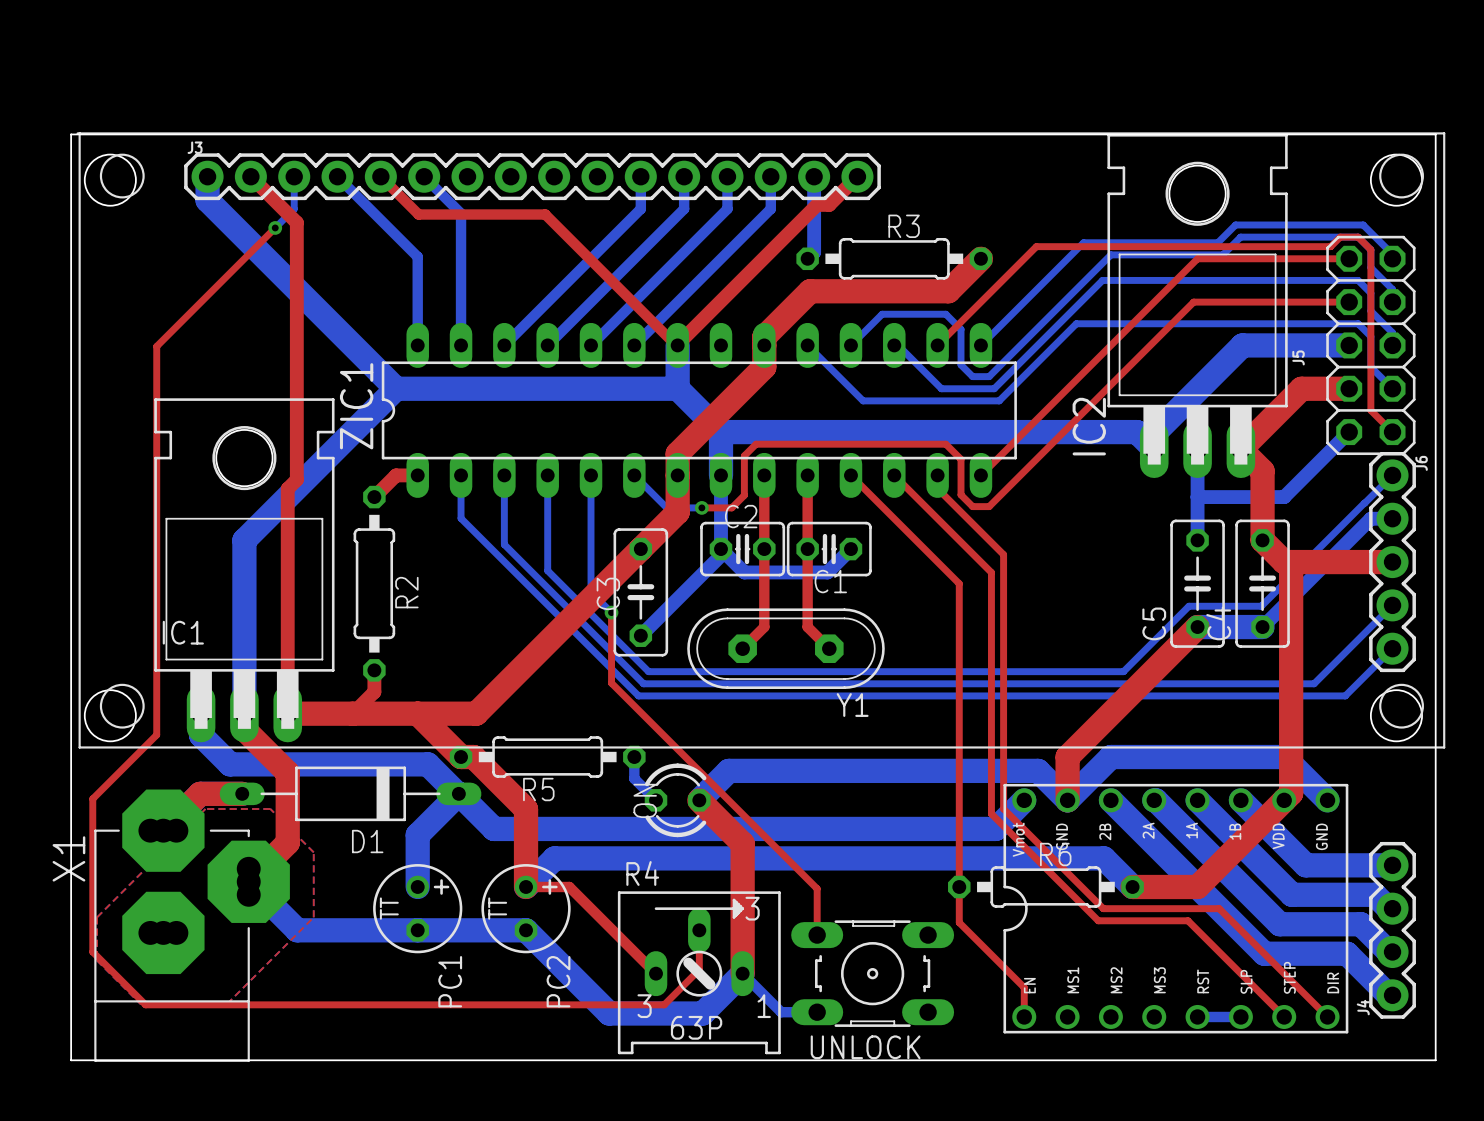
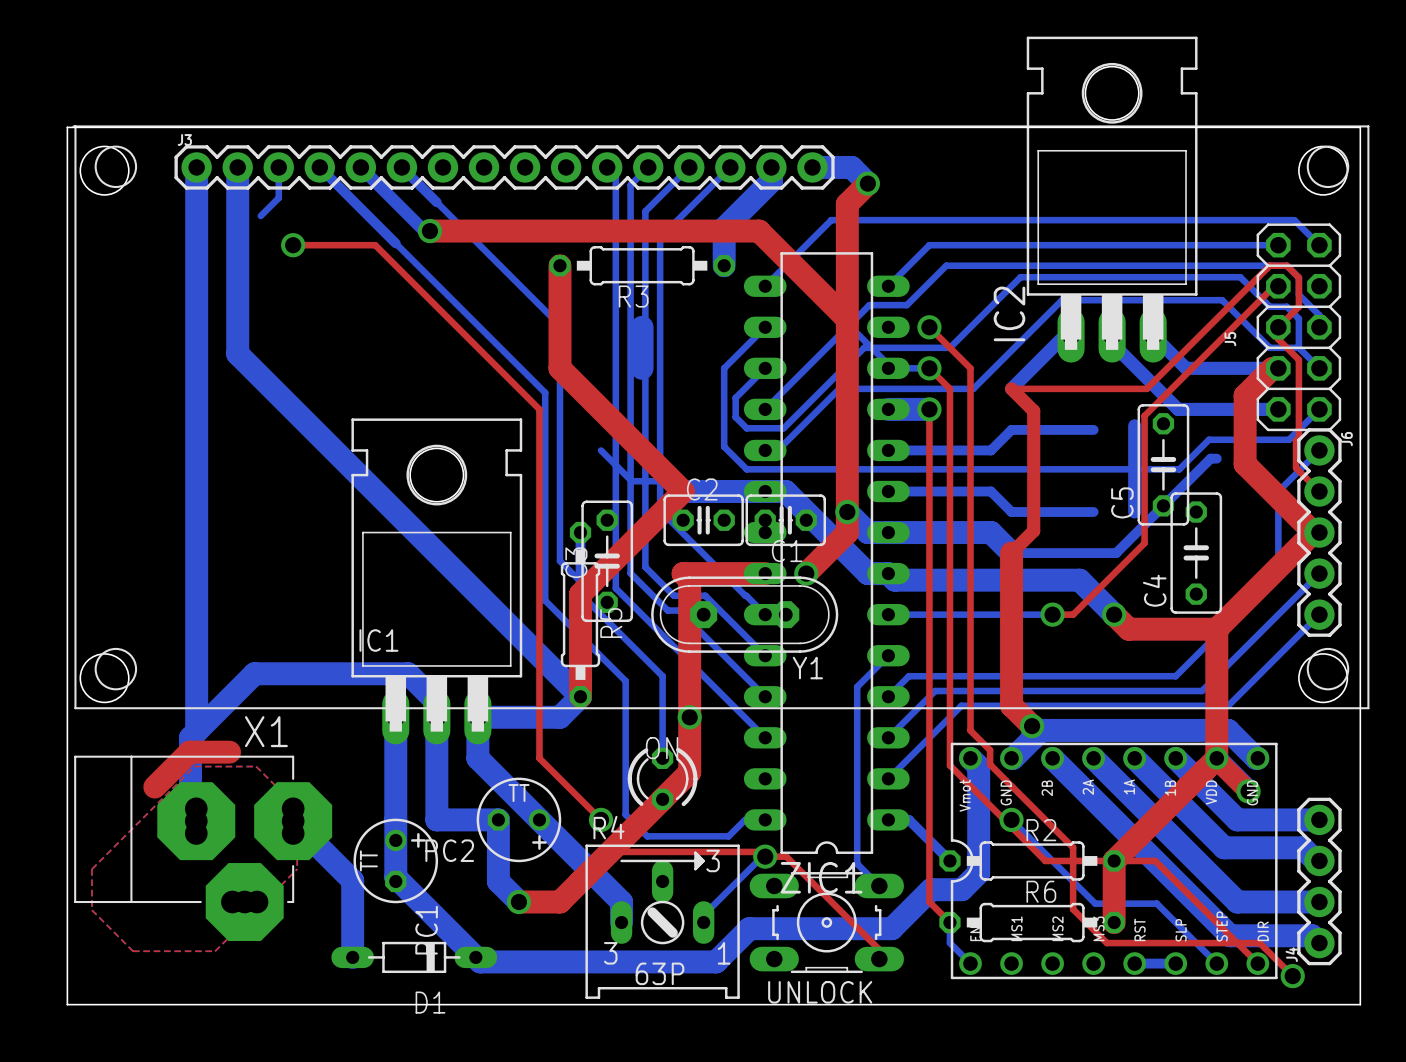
top track: (250, 176) (296, 222) (296, 479) (287, 488) (287, 713) (476, 713) (677, 512) (677, 453) (764, 367) (764, 337) (810, 291) (948, 291) (980, 258) -> none
bottom track: none -> (237, 167) (237, 353) (580, 696) (559, 717) (477, 717) (477, 758) (621, 902) (621, 922)
top track: (380, 176) (418, 214) (545, 214) (676, 345) (817, 204) (829, 204) (857, 176) -> none
bottom track: none -> (360, 167) (424, 231) (429, 231)
bottom track: (640, 176) (640, 208) (504, 345) -> (607, 167) (615, 176) (615, 588) (765, 737)
bottom track: (684, 176) (684, 208) (547, 345) -> (648, 167) (630, 185) (630, 573) (667, 610) (679, 610) (765, 696)
bottom track: (727, 176) (727, 208) (591, 345) -> (689, 167) (645, 211) (645, 567) (673, 595) (705, 595) (765, 655)
bottom track: (770, 176) (770, 208) (634, 345) -> (730, 167) (660, 237) (660, 510) (765, 614)
bottom track: none -> (812, 167) (851, 167) (867, 183)
bottom track: (814, 191) (814, 252) (807, 258) -> (771, 181) (724, 228) (724, 265)
top track: none -> (867, 183) (847, 204) (847, 532) (806, 573)
via: none -> (867, 183)
bottom track: (207, 200) (396, 388) -> (196, 189) (196, 731)
bottom track: (461, 213) (461, 345) -> (436, 202) (559, 325) (559, 450)
R3 name position: R3 (904, 226) -> R3 (633, 296)
top track: (275, 227) (156, 346) (156, 734) (92, 798) (92, 951) (145, 1004) (664, 1004) (699, 969) (699, 930) -> none
via: (275, 227) -> none
top track: none -> (429, 231) (759, 231) (847, 319)
via: none -> (429, 231)
bottom track: (417, 256) (417, 345) -> (395, 243) (545, 392) (545, 600) (625, 681) (625, 814) (647, 836) (728, 836) (745, 819) (765, 819)
top track: none -> (293, 245) (375, 245) (539, 409) (539, 758) (601, 819)
via: none -> (293, 245)
R3 position: (894, 258) -> (642, 265)
top track: (1349, 258) (1197, 258) (980, 475) -> none
bottom track: none -> (1278, 245) (929, 245) (888, 286)
bottom track: (1392, 258) (1392, 254) (1363, 224) (1235, 224) (1217, 242) (1083, 242) (980, 345) -> (1319, 245) (1294, 220) (831, 220) (765, 286)
top track: none -> (559, 265) (559, 368) (683, 491) (580, 594) (580, 696)
bottom track: (1102, 280) (994, 388) (980, 388) -> (1044, 265) (946, 265) (906, 305) (869, 305) (765, 409)
top track: (1370, 293) (1370, 249) (1358, 237) (1340, 237) (1330, 246) (1036, 246) (937, 345) -> (1298, 277) (1286, 265) (1269, 265) (1146, 388) (1011, 388) (1033, 411) (1033, 530) (1011, 553) (1011, 705) (1032, 726)
top track: (1344, 302) (1193, 302) (989, 506) (972, 506) (961, 494) (961, 459) (945, 444) (756, 444) (744, 455) (744, 495) (731, 507) (701, 507) -> (1274, 286) (1144, 415) (1144, 543) (1073, 614) (1052, 614)
bottom track: (1392, 302) (1392, 289) (1370, 267) (1370, 249) (1358, 237) (1240, 237) (1222, 254) (1110, 254) (989, 376) (972, 376) (961, 364) (961, 329) (945, 314) (882, 314) (850, 345) -> none
IC2 position: (1197, 306) -> (1112, 199)
bottom track: (1340, 323) (1076, 323) (999, 400) (863, 400) (807, 345) -> (1269, 306) (1240, 277) (1020, 277) (949, 347) (864, 347) (783, 428) (746, 428) (735, 417) (735, 397) (765, 368)
top track: (1370, 323) (1370, 379) -> (1298, 306) (1278, 327) (1278, 339) (1298, 359)
bottom track: none -> (765, 327) (724, 368) (724, 446) (746, 469) (1179, 469) (1208, 439) (1289, 439) (1319, 409)
top track: none -> (929, 327) (970, 368) (970, 730) (990, 750) (990, 764) (1073, 847) (1073, 909) (1106, 943) (1259, 943) (1292, 976)
via: none -> (929, 327)
bottom track: (1349, 345) (1242, 345) (1154, 433) (1154, 449) (1136, 432) (980, 432) -> none
bottom track: none -> (1071, 335) (1064, 335) (1011, 388)
bottom track: none -> (1153, 335) (1186, 368) (1278, 368)
bottom track: none -> (1298, 347) (1269, 347) (1222, 300) (1062, 300) (973, 388) (839, 388) (777, 450) (765, 450)
bottom track: (396, 388) (677, 388) (720, 432) -> none
bottom track: (396, 388) (244, 540) (244, 713) -> none
via: none -> (929, 368)
top track: none -> (1272, 368) (1245, 395) (1245, 464) (1313, 532) (1216, 629)
top track: (1349, 388) (1301, 388) (1240, 449) (1262, 471) (1262, 540) (1284, 562) (1386, 562) -> none
ZIC1 rotation: 0° (699, 410) -> 90° counterclockwise (826, 553)
top track: (1370, 410) (1392, 432) -> (1298, 388) (1298, 437) (1296, 440) (1296, 468) (1319, 491)
bottom track: (720, 432) (720, 555) (640, 635) -> none
bottom track: (720, 432) (937, 432) -> none
top track: none -> (929, 409) (929, 902) (949, 922)
via: none -> (929, 409)
bottom track: (1349, 432) (1284, 497) (1197, 497) -> (1278, 409) (1178, 409) (1112, 343) (1112, 335)
bottom track: none -> (1093, 429) (1011, 429) (991, 450) (888, 450)
top track: (417, 475) (396, 475) (374, 497) -> none
bottom track: (461, 475) (461, 518) (638, 695) (1345, 695) -> (888, 778) (961, 705) (1228, 705) (1274, 659)
bottom track: (504, 475) (504, 544) (643, 683) (1314, 683) -> (888, 737) (935, 691) (1202, 691) (1245, 647)
bottom track: (547, 475) (547, 570) (648, 671) (1123, 671) (1188, 606) (1261, 606) (1364, 503) -> (888, 696) (908, 676) (1175, 676) (1278, 573) (1278, 491) (1293, 476)
top track: (764, 475) (764, 627) (742, 648) -> none
top track: (807, 475) (807, 627) (829, 648) -> none
top track: (850, 475) (959, 583) (959, 922) (1024, 987) (1024, 1016) -> none
top track: (894, 475) (991, 572) (991, 813) (1098, 920) (1188, 920) (1284, 1016) -> none
top track: (937, 475) (937, 488) (1003, 554) (1003, 808) -> (929, 368) (949, 388) (950, 766)
bottom track: none -> (1216, 458) (1210, 458) (1116, 553) (1011, 553)
via: (701, 507) -> none
bottom track: none -> (683, 491) (785, 491) (867, 573) (888, 573) (894, 580) (1079, 580) (1114, 614)
bottom track: none -> (888, 491) (991, 491) (1011, 512) (1093, 512)
bottom track: (1392, 518) (1370, 518) (1262, 627) (1197, 627) -> none
bottom track: none -> (847, 512) (867, 532) (991, 532) (1011, 552)
via: none -> (847, 512)
bottom track: (720, 549) (744, 572) (827, 572) (850, 549) -> none
bottom track: none -> (580, 532) (580, 594) (662, 676) (662, 758)
top track: (1291, 562) (1291, 793) (1284, 800) -> none
IC1 position: (244, 570) -> (436, 581)
R2 rotation: 0° (374, 583) -> 90° clockwise (1032, 860)
R2 position: (374, 583) -> (1032, 860)
C5 position: (1197, 583) -> (1163, 464)
R2 name position: R2 (406, 592) -> R2 (1041, 830)
top track: none -> (765, 573) (683, 573) (689, 580) (689, 772) (559, 902) (518, 902)
via: none -> (806, 573)
top track: (611, 612) (611, 683) (817, 888) (817, 935) -> none
via: (611, 612) -> none
top track: (1197, 627) (1067, 757) (1067, 800) -> none
bottom track: none -> (888, 614) (1052, 614)
via: none -> (1052, 614)
top track: none -> (1114, 614) (1128, 629) (1216, 629)
via: none -> (1114, 614)
top track: none -> (1216, 629) (1216, 759) (1248, 791)
top track: (374, 670) (374, 692) (352, 713) -> none
bottom track: none -> (888, 655) (857, 686) (857, 863) (879, 886)
bottom track: (201, 713) (201, 735) (230, 764) (427, 764) (458, 793) -> none
top track: (244, 713) (244, 729) (287, 772) (287, 842) (248, 881) -> none
top track: (417, 713) (461, 757) (473, 757) (526, 809) (526, 887) (569, 887) (656, 973) -> none
R5 rotation: 0° (547, 757) -> 90° clockwise (580, 614)
R5 position: (547, 757) -> (580, 614)
bottom track: (634, 757) (634, 778) (656, 800) -> none
via: none -> (689, 717)
D1 footprint: [219, 766, 482, 822] -> [331, 941, 498, 974]
via: none -> (1032, 726)
R5 name position: R5 (538, 789) -> R5 (611, 623)
bottom track: (458, 793) (417, 835) -> (395, 717) (395, 791)
bottom track: (458, 793) (493, 828) (995, 828) (1024, 800) -> (395, 840) (395, 877) (480, 961) (716, 961) (749, 928) (891, 928) (930, 889) (961, 889) (978, 872) (978, 766) (970, 758)
ON rotation: 0° (677, 800) -> 90° clockwise (662, 778)
top track: (699, 800) (742, 843) (742, 973) -> none
bottom track: (699, 800) (728, 770) (1038, 770) (1067, 800) (1110, 757) (1284, 757) (1327, 800) -> (1011, 758) (1041, 730) (1228, 730) (1257, 758)
bottom track: (1154, 800) (1279, 924) (1360, 924) (1388, 951) -> (1093, 758) (1237, 902) (1315, 902)
via: none -> (1248, 791)
via: none -> (601, 819)
bottom track: none -> (888, 819) (908, 819) (949, 860)
bottom track: none -> (1011, 819) (1095, 903) (1156, 903) (1216, 963)
via: none -> (1011, 819)
bottom track: none -> (293, 821) (352, 880) (352, 957)
bottom track: (248, 881) (297, 930) (526, 930) -> (196, 821) (190, 815) (190, 737) (254, 673) (408, 673) (436, 702) (436, 819) (498, 819) (498, 881)
bottom track: (526, 887) (554, 858) (1103, 858) (1132, 887) -> none
R6 position: (1045, 887) -> (1032, 922)
top track: (1132, 887) (1197, 887) -> (1114, 922) (1114, 860) (1134, 840)
bottom track: none -> (765, 856) (762, 856) (703, 915) (703, 922)
via: none -> (765, 856)
PC2 rotation: 0° (526, 908) -> 90° clockwise (518, 819)
X1 rotation: 0° (192, 925) -> 90° clockwise (203, 848)
top track: none -> (580, 881) (610, 851) (760, 851) (765, 856) (786, 856) (879, 949) (879, 959)
bottom track: (547, 951) (609, 1013) (702, 1013) (742, 973) (781, 1012) (817, 1012) -> none
via: none -> (518, 902)
bottom track: (1264, 953) (1347, 953) (1388, 995) (1392, 995) -> (1197, 903) (1230, 935) (1312, 935) (1319, 943)
bottom track: none -> (949, 922) (949, 943) (970, 963)
via: none -> (1292, 976)

